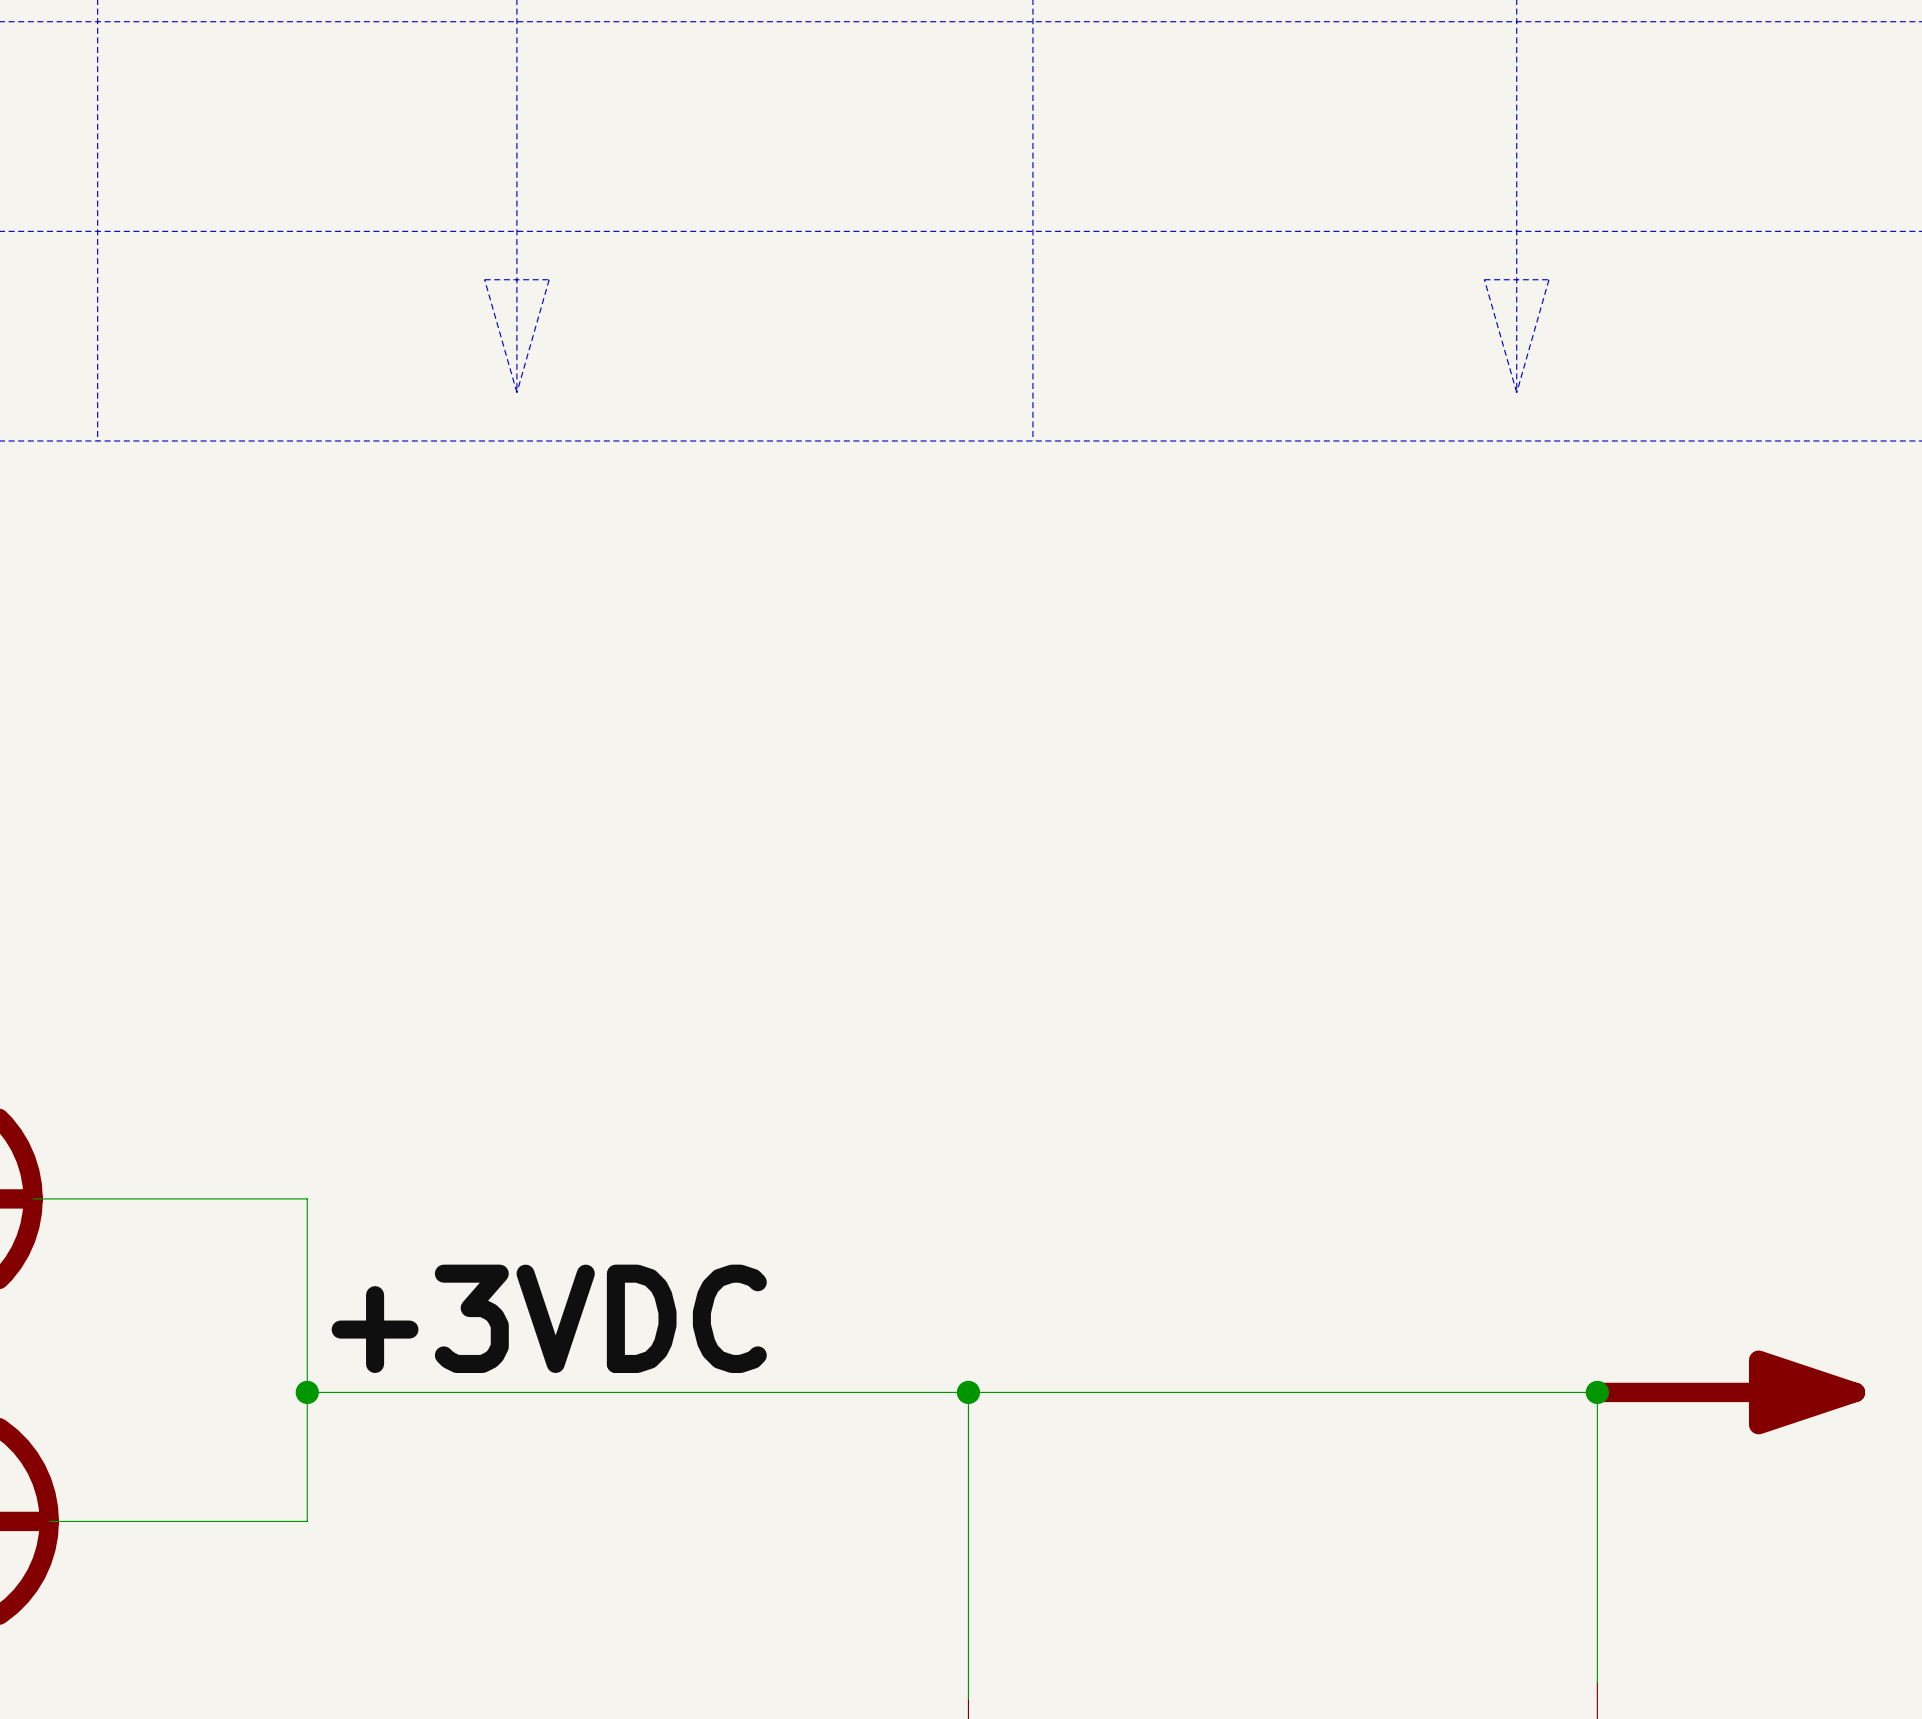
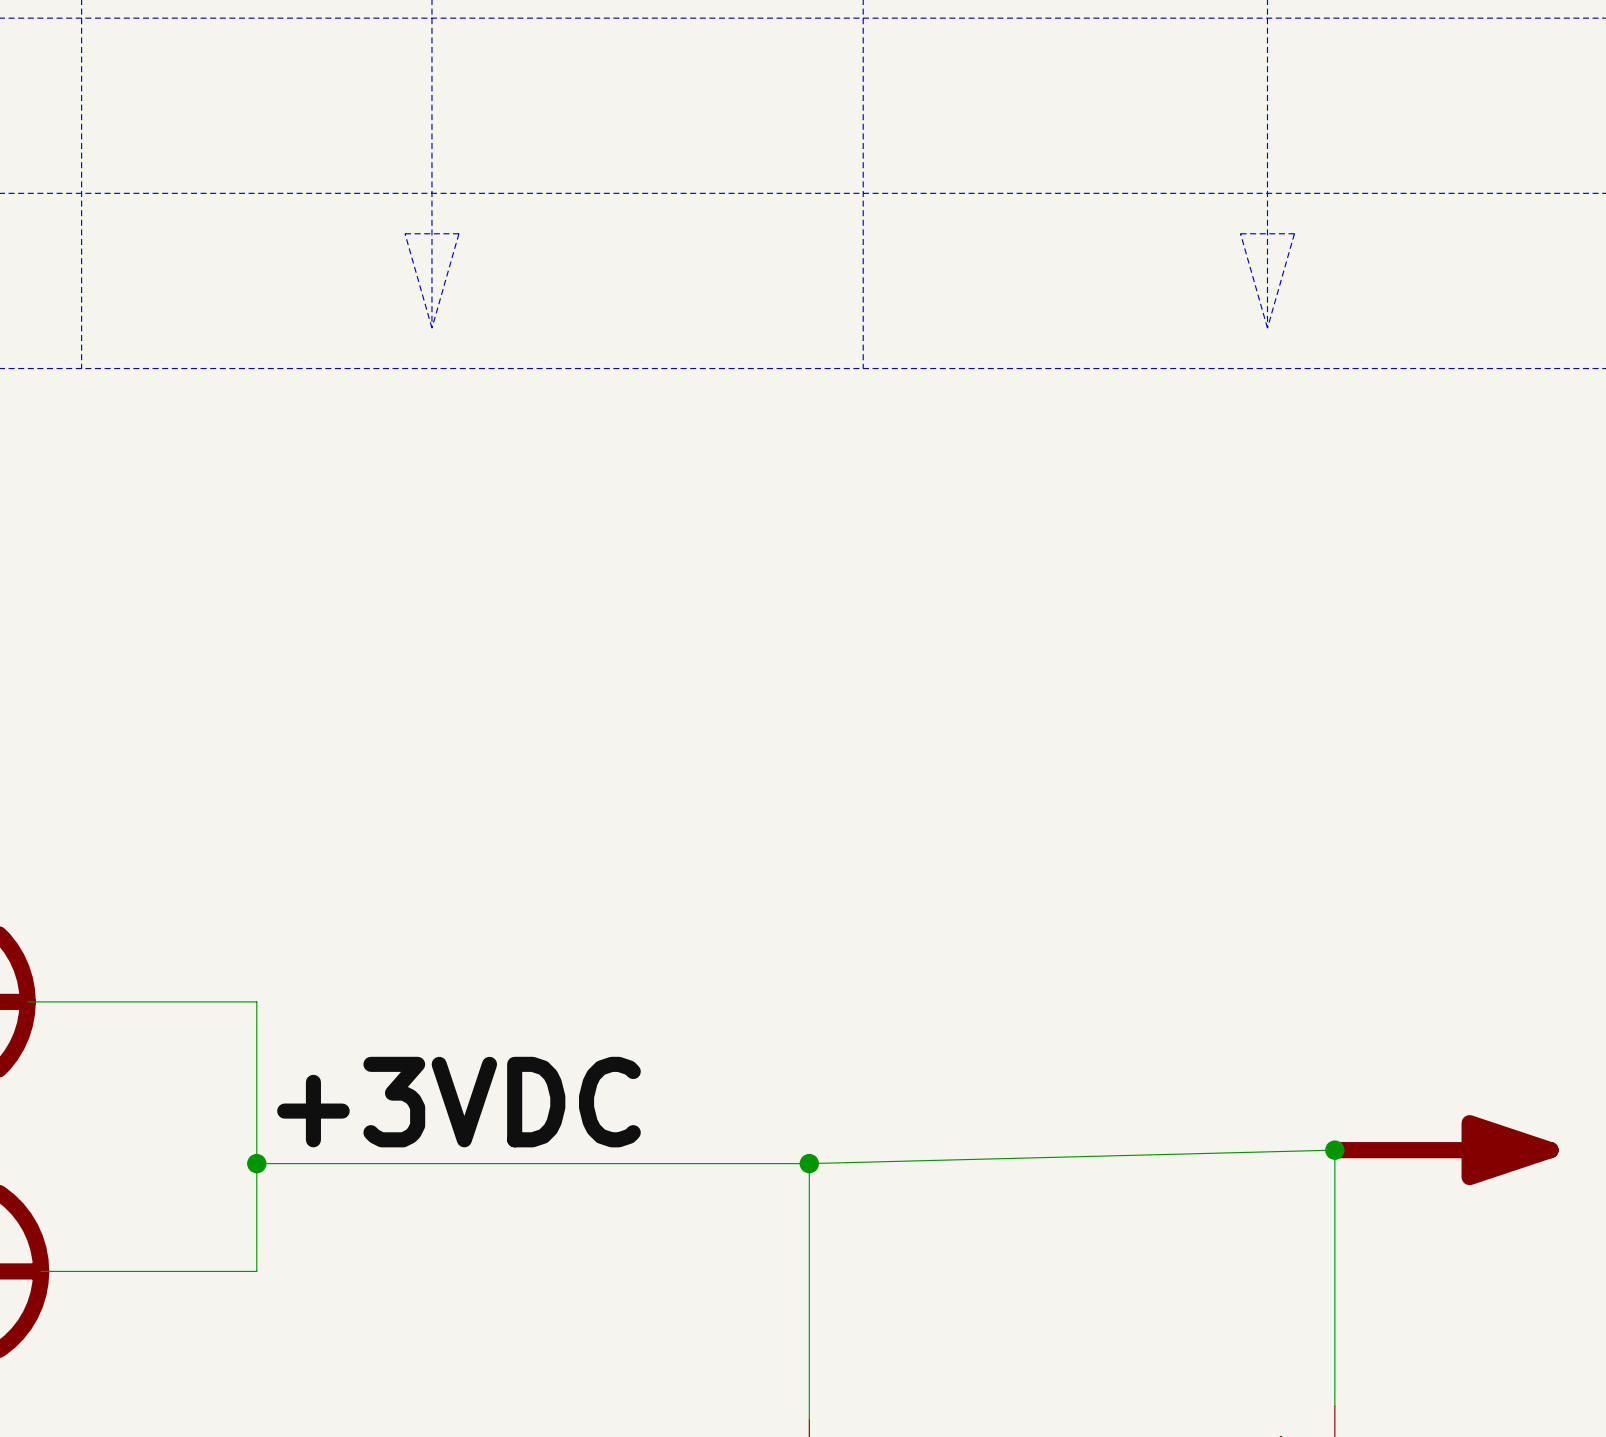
wire: (968, 1392) (1597, 1392) -> (809, 1163) (1334, 1150) (1334, 1163)
junction position: (1597, 1392) -> (1334, 1150)
power symbol position: (1726, 1392) -> (1442, 1150)

